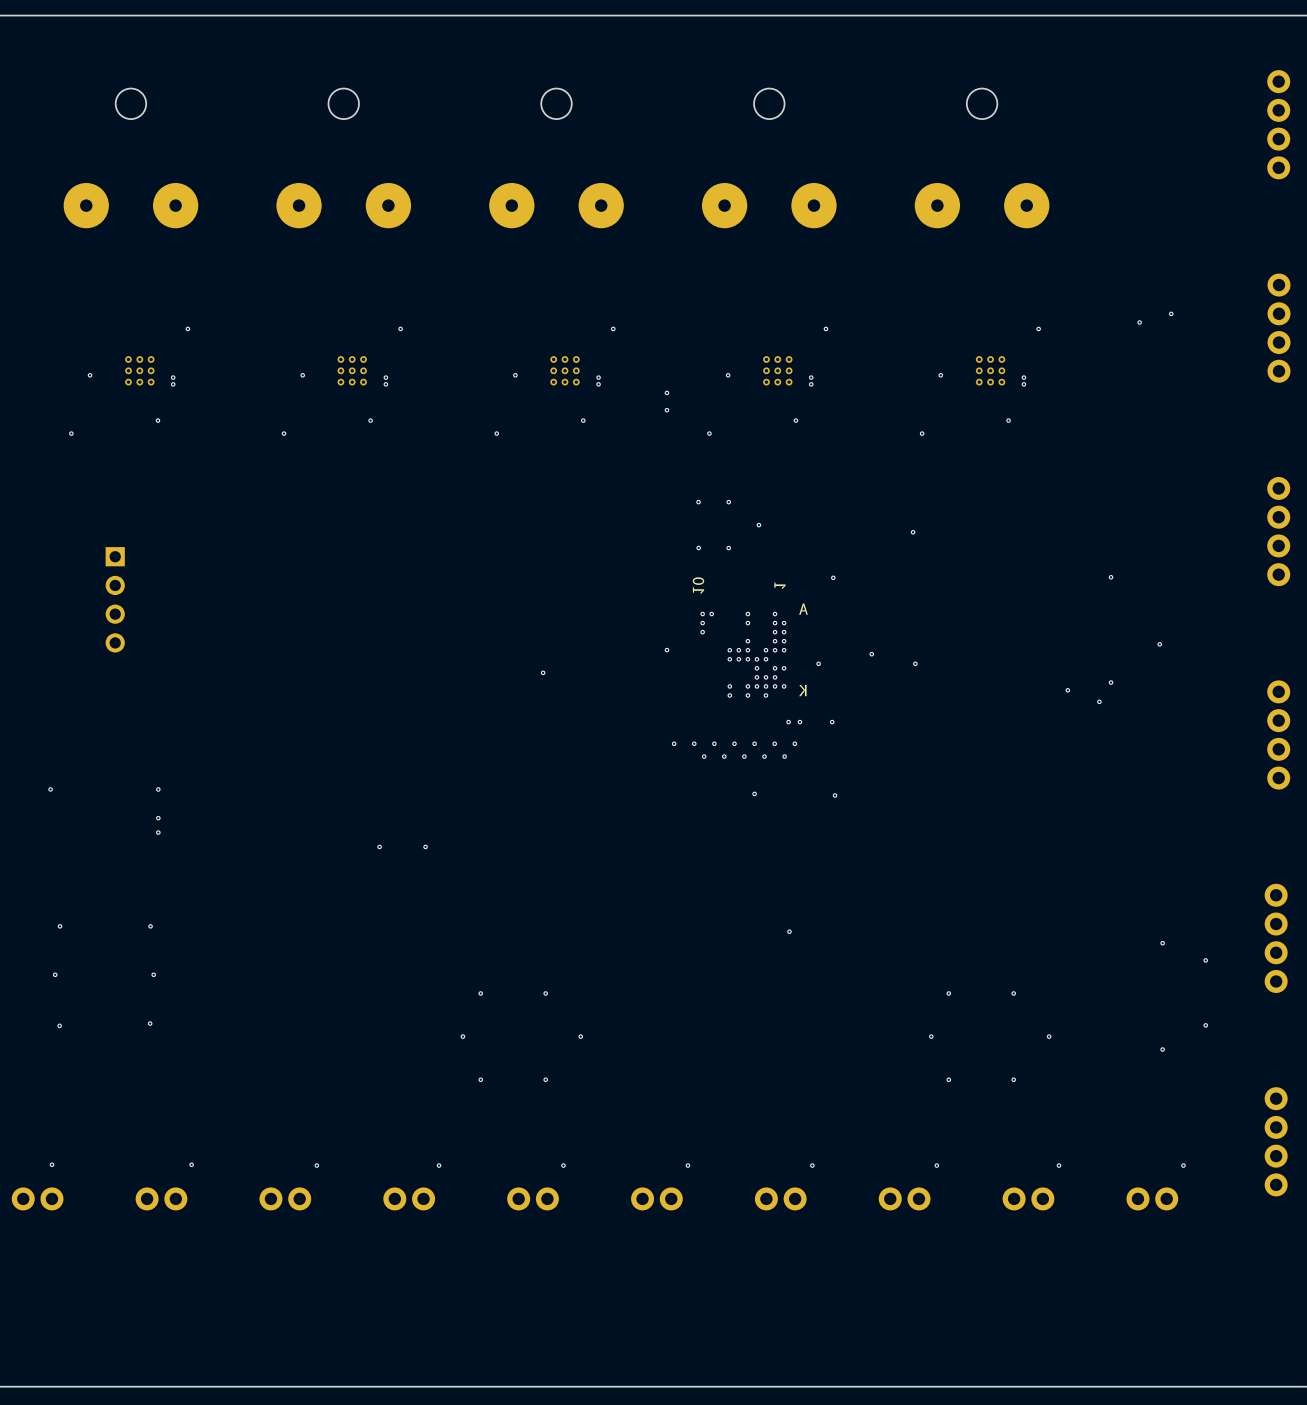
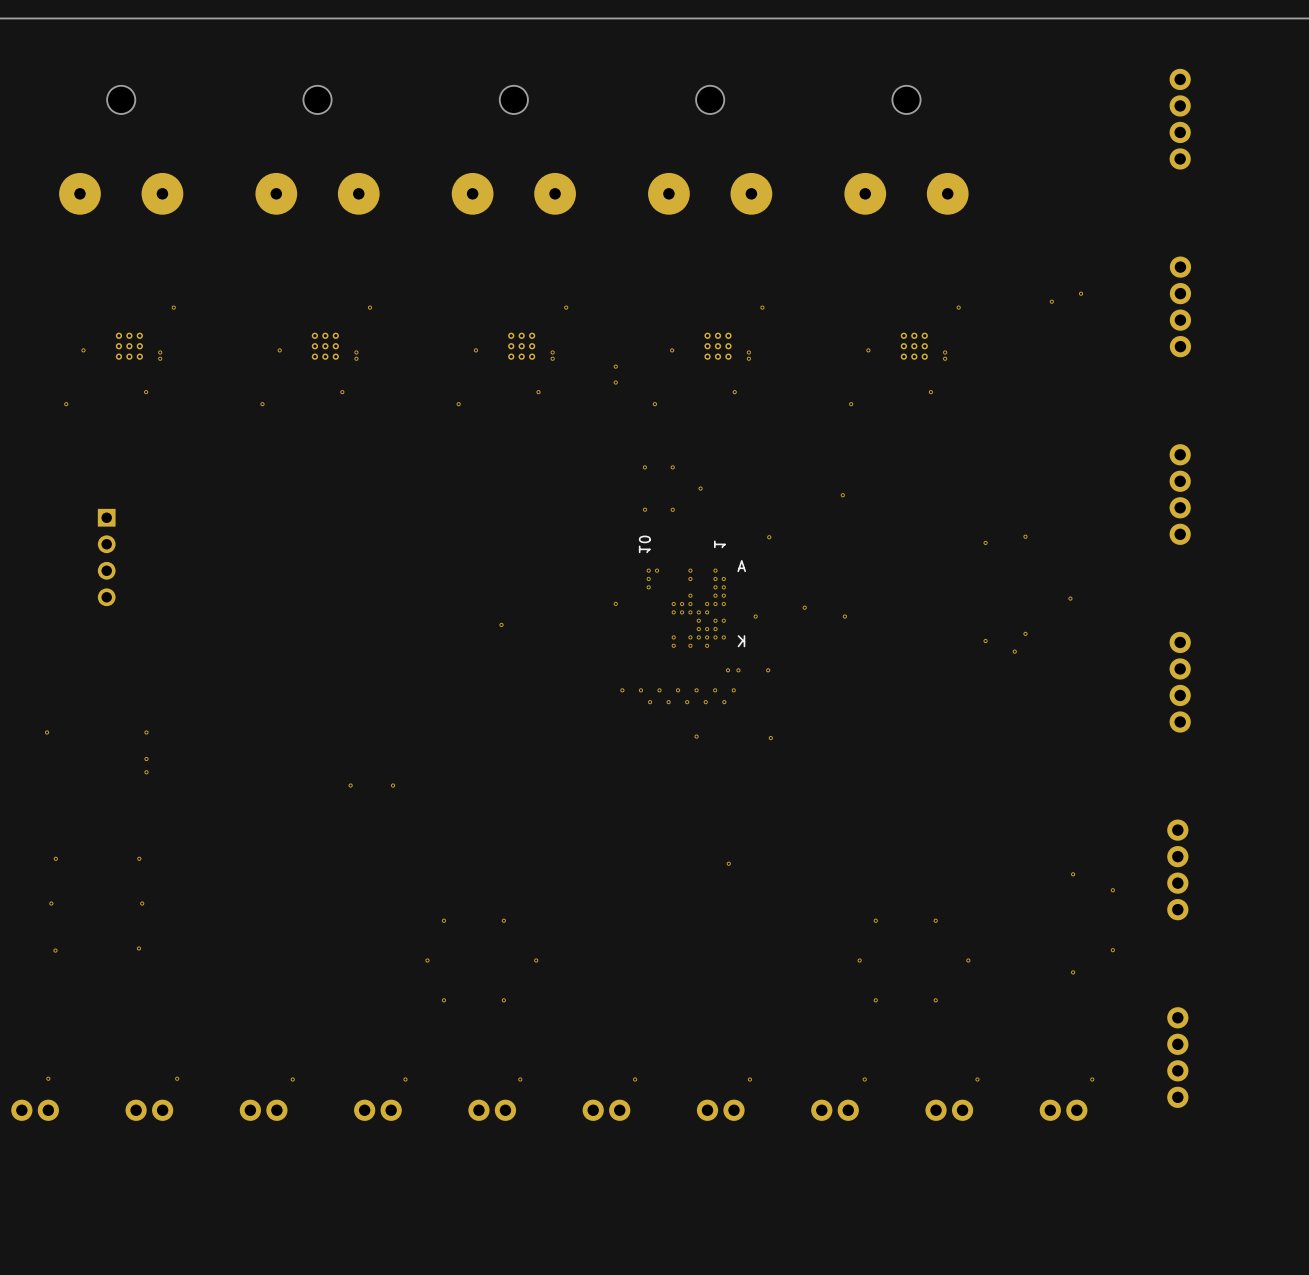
via: none -> (985, 542)

